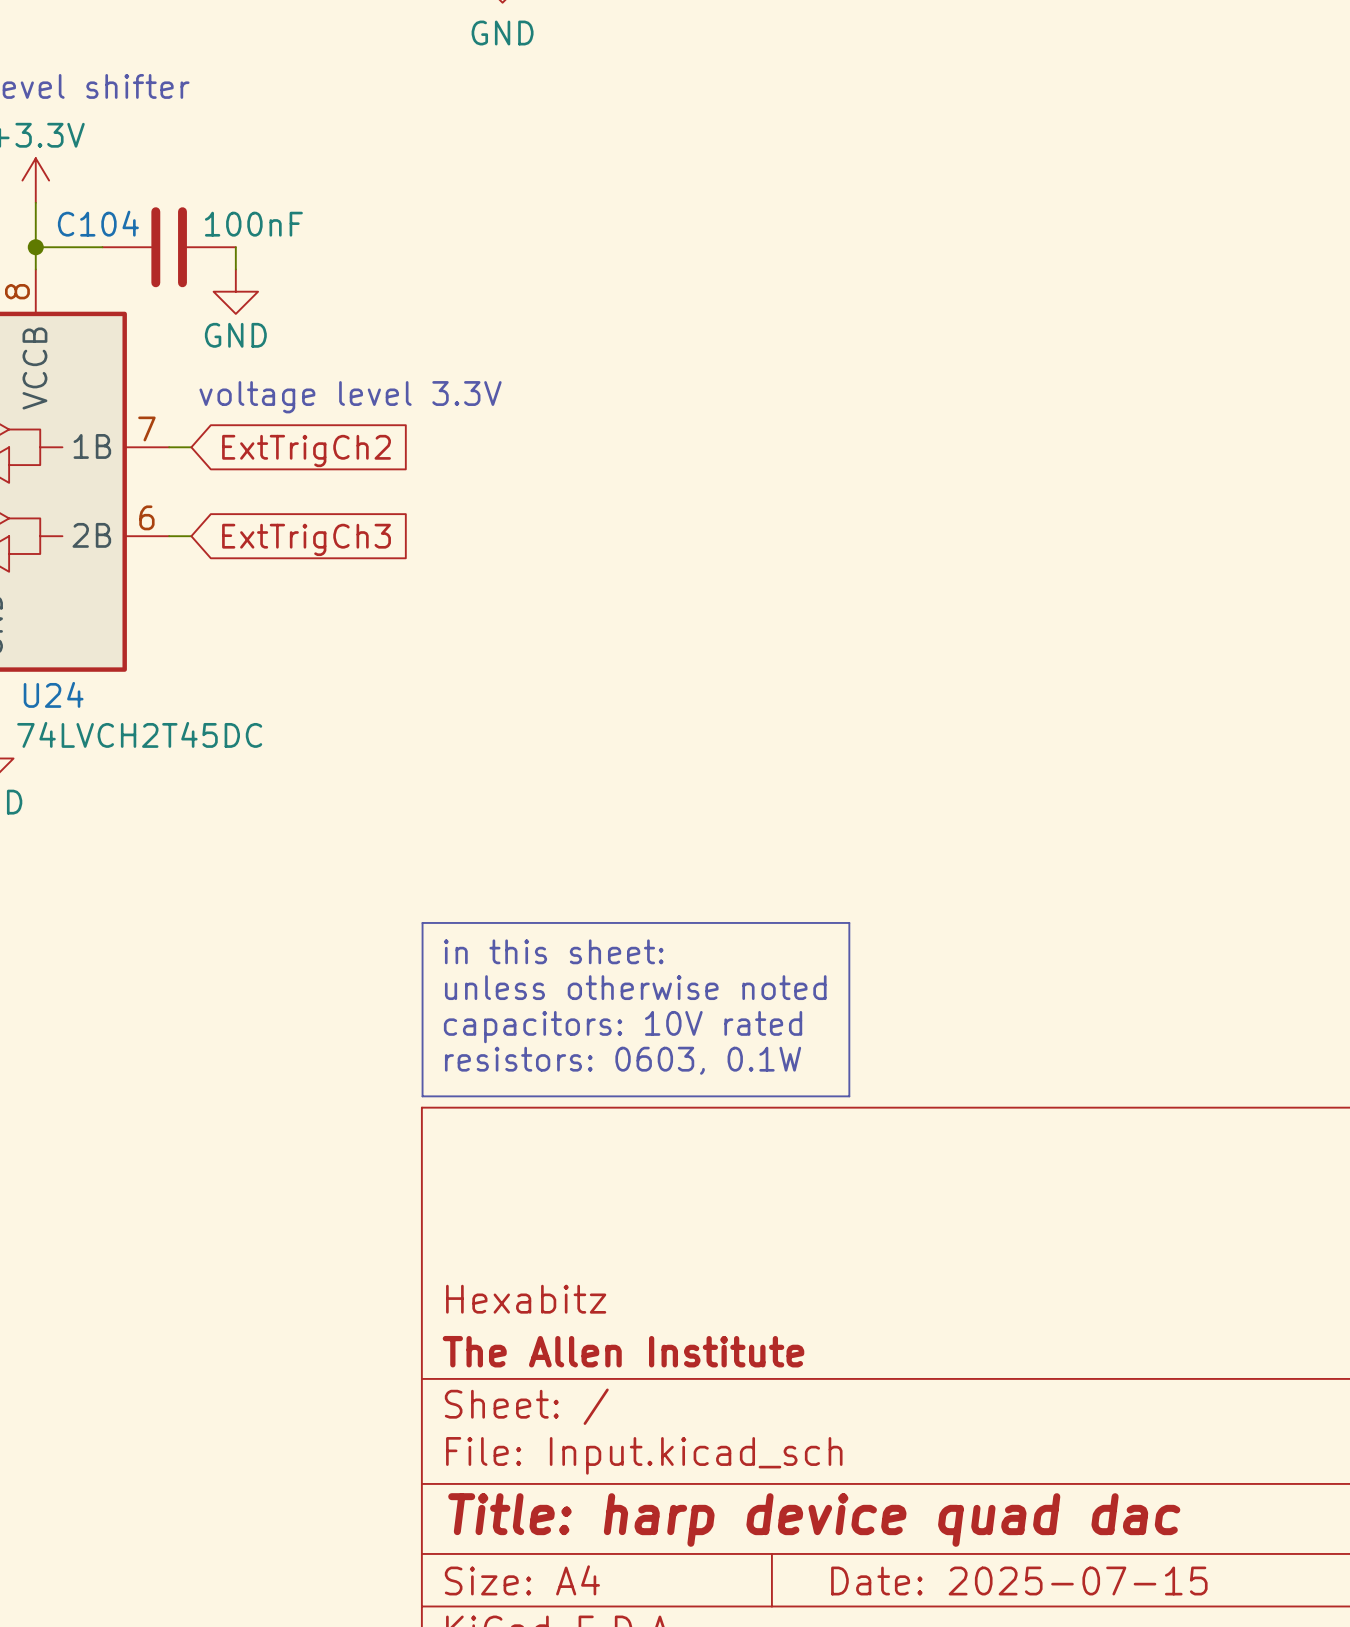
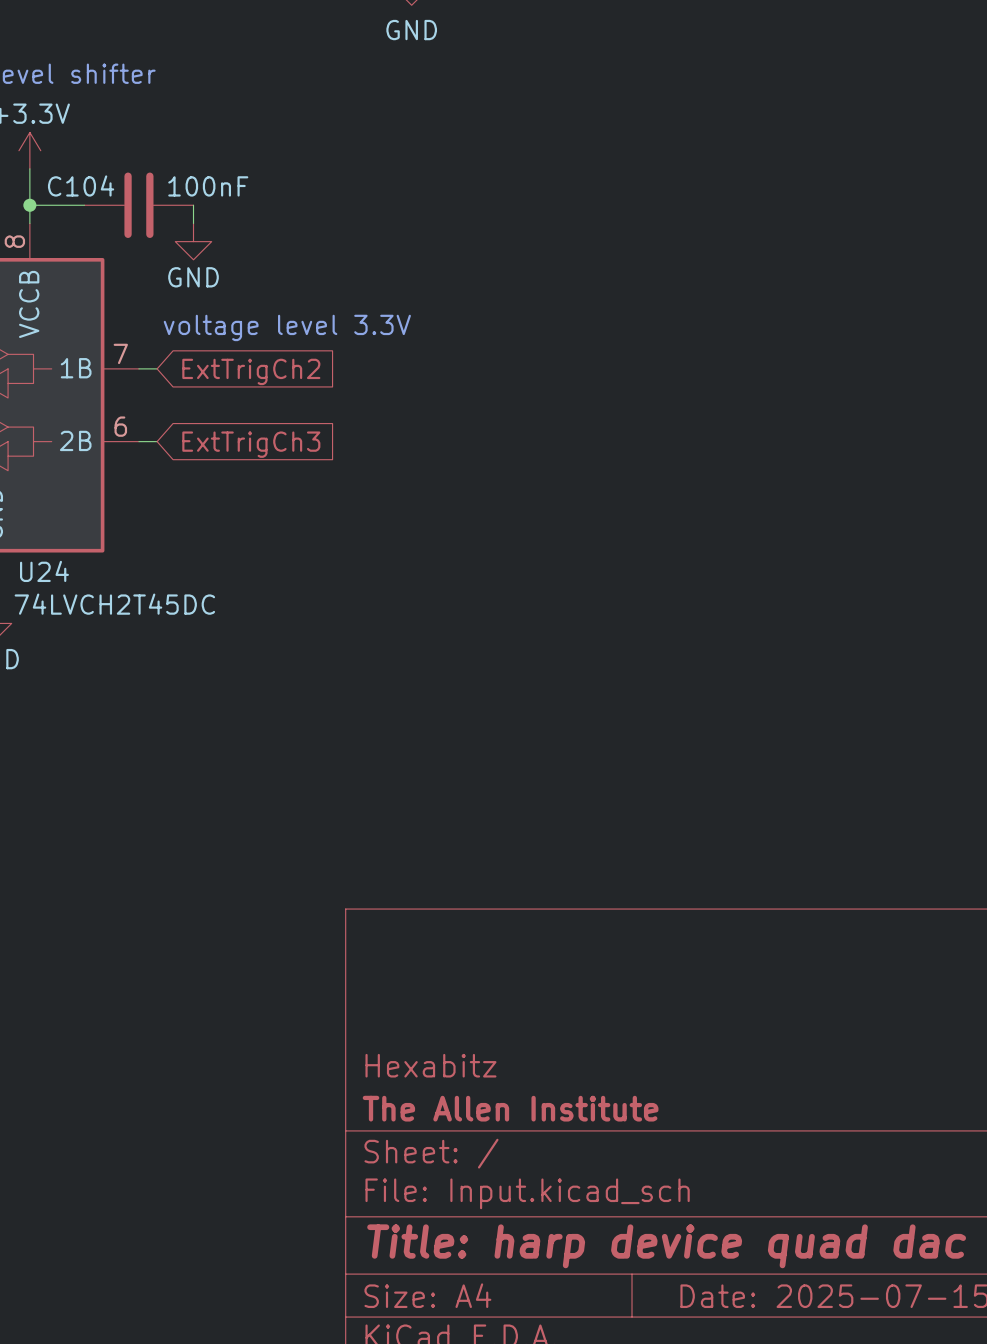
line: (422, 922) (849, 922) (849, 1096) (422, 1096) (422, 922) -> none
text: in this sheet: (553, 951) -> none
text: unless otherwise noted (635, 987) -> none
text: capacitors: 10V rated (623, 1027) -> none
text: resistors: 0603, 0.1W (623, 1060) -> none

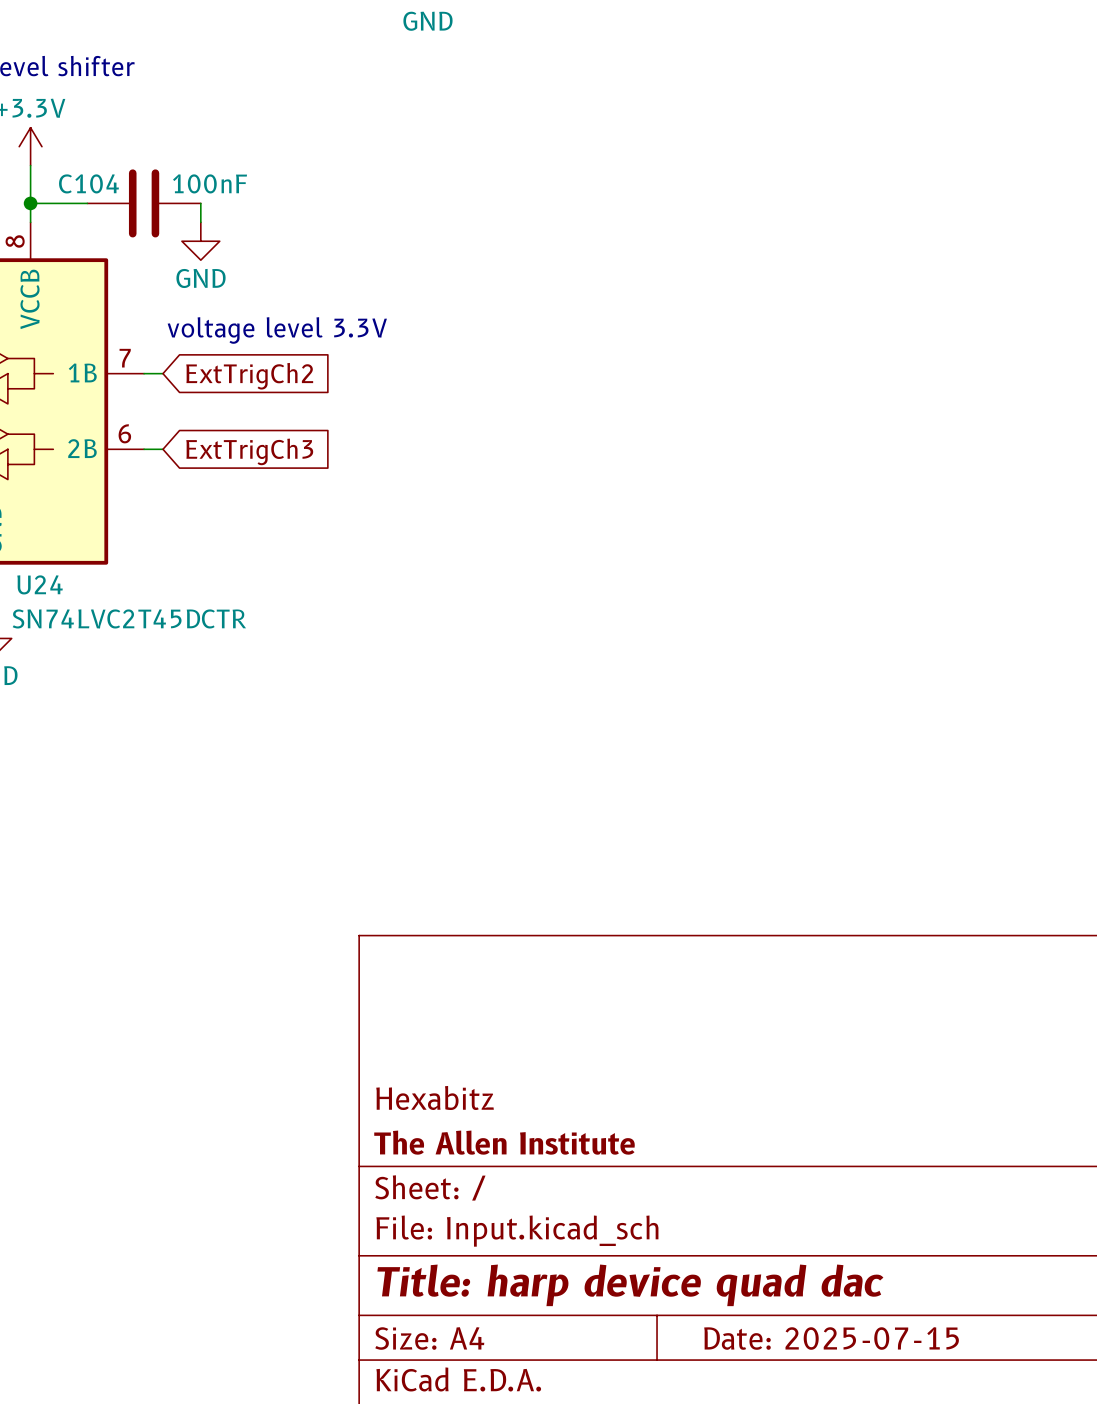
U24 value: 74LVCH2T45DC (114, 604) -> SN74LVC2T45DCTR (129, 618)

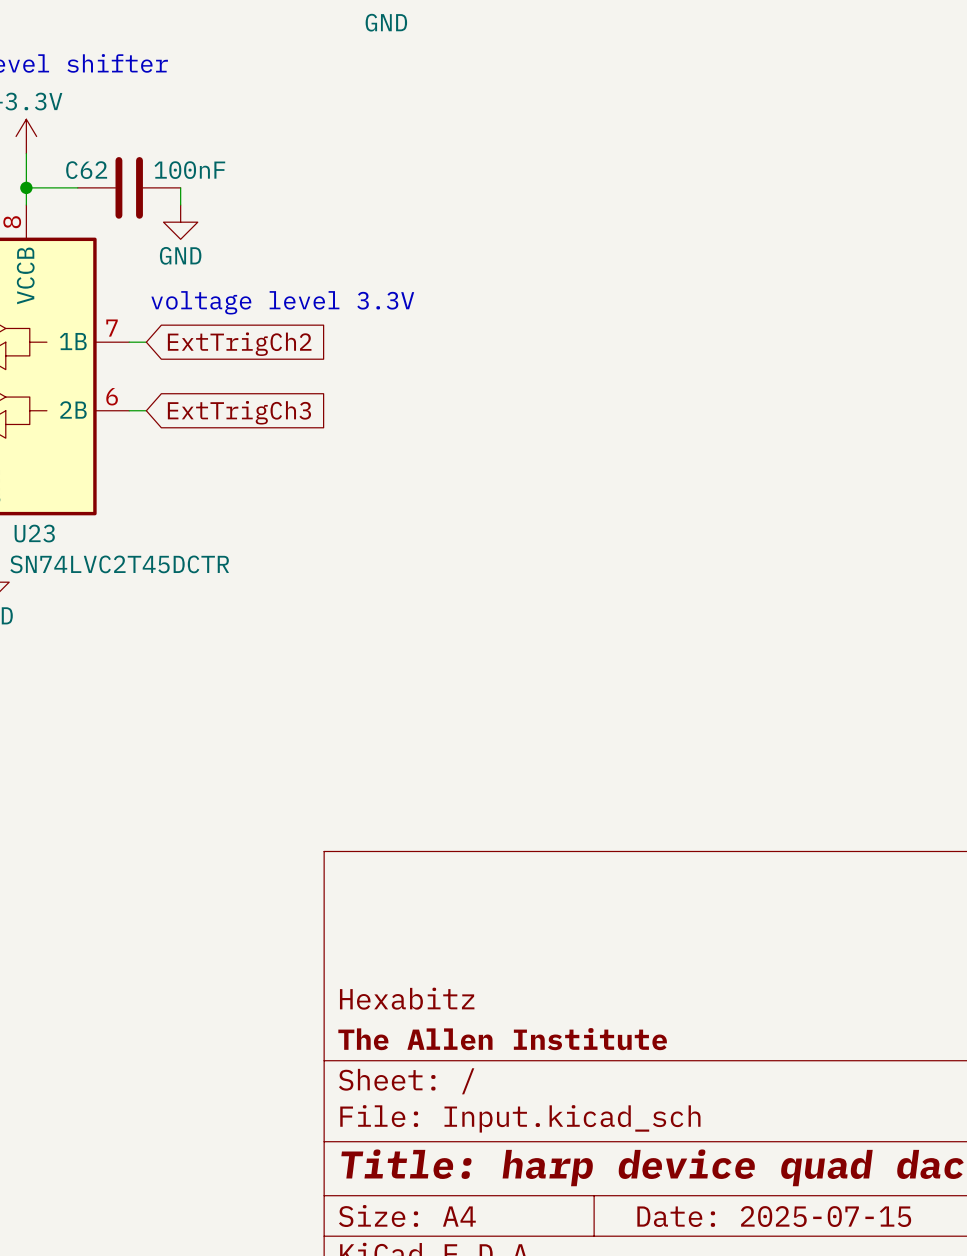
C104 name: C104 (88, 183) -> C62 (86, 170)
U24 name: U24 (40, 584) -> U23 (34, 533)

